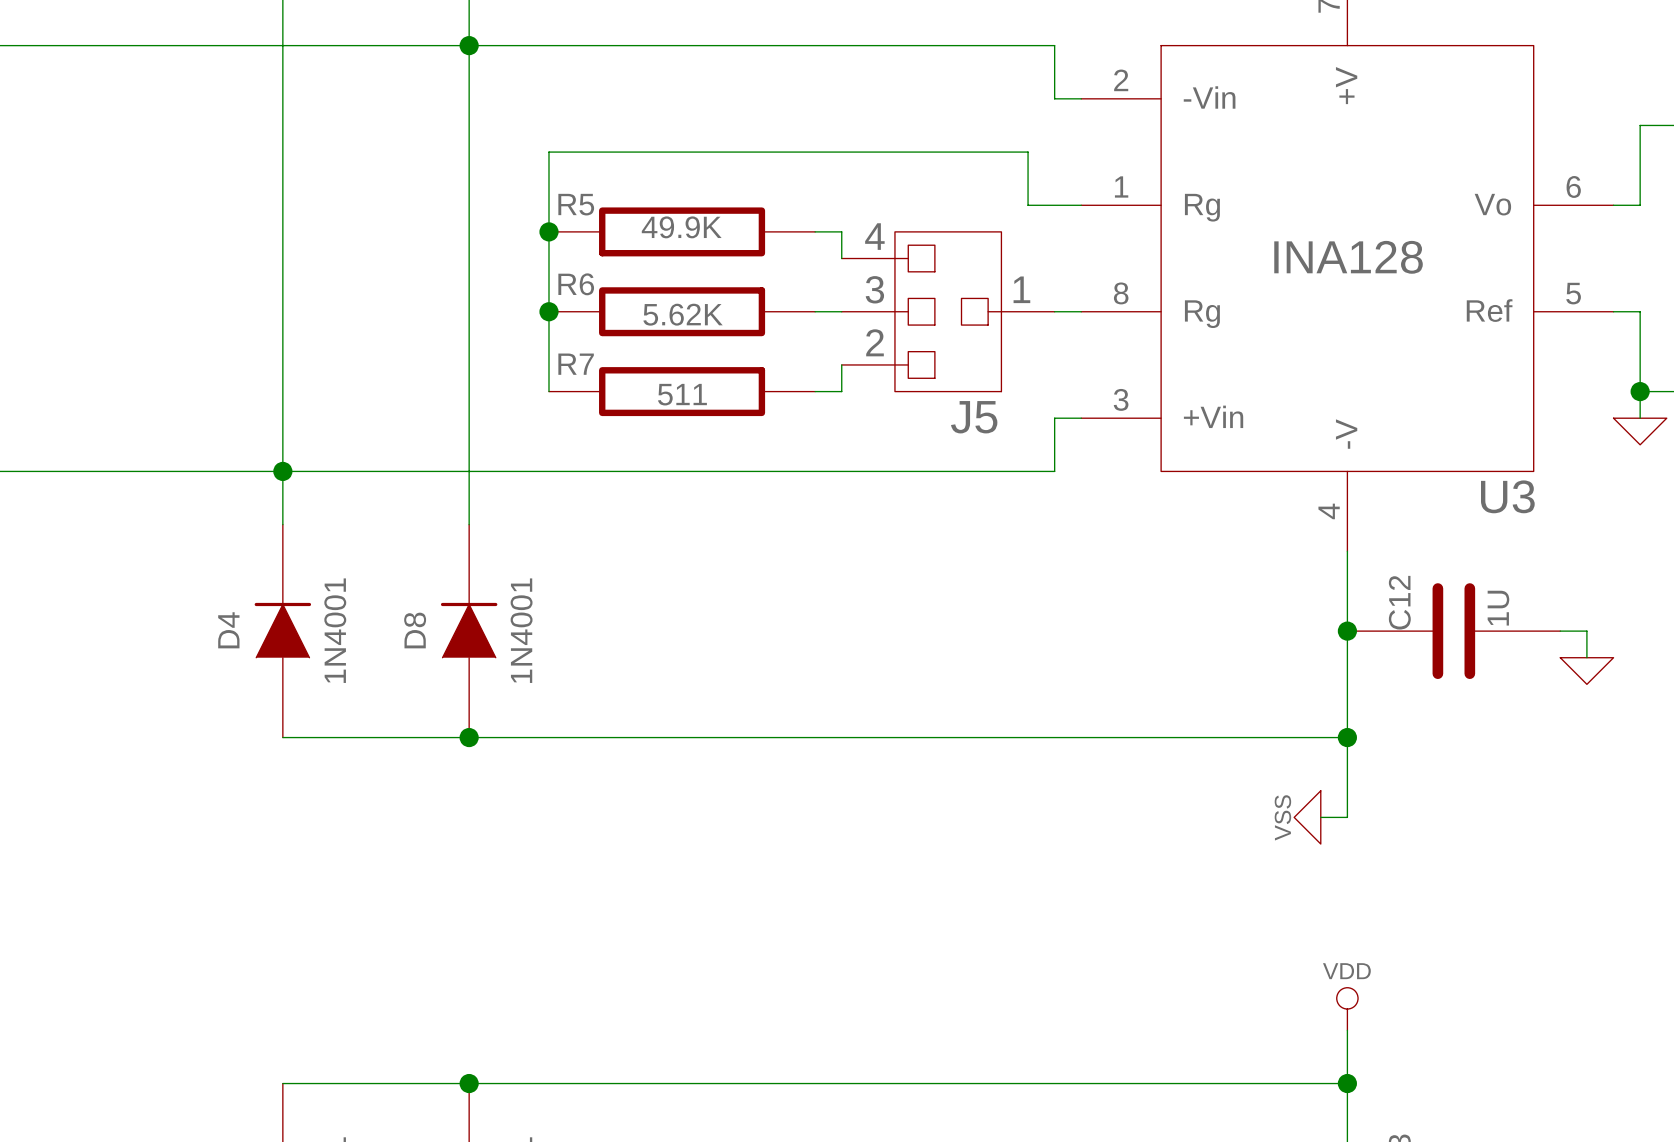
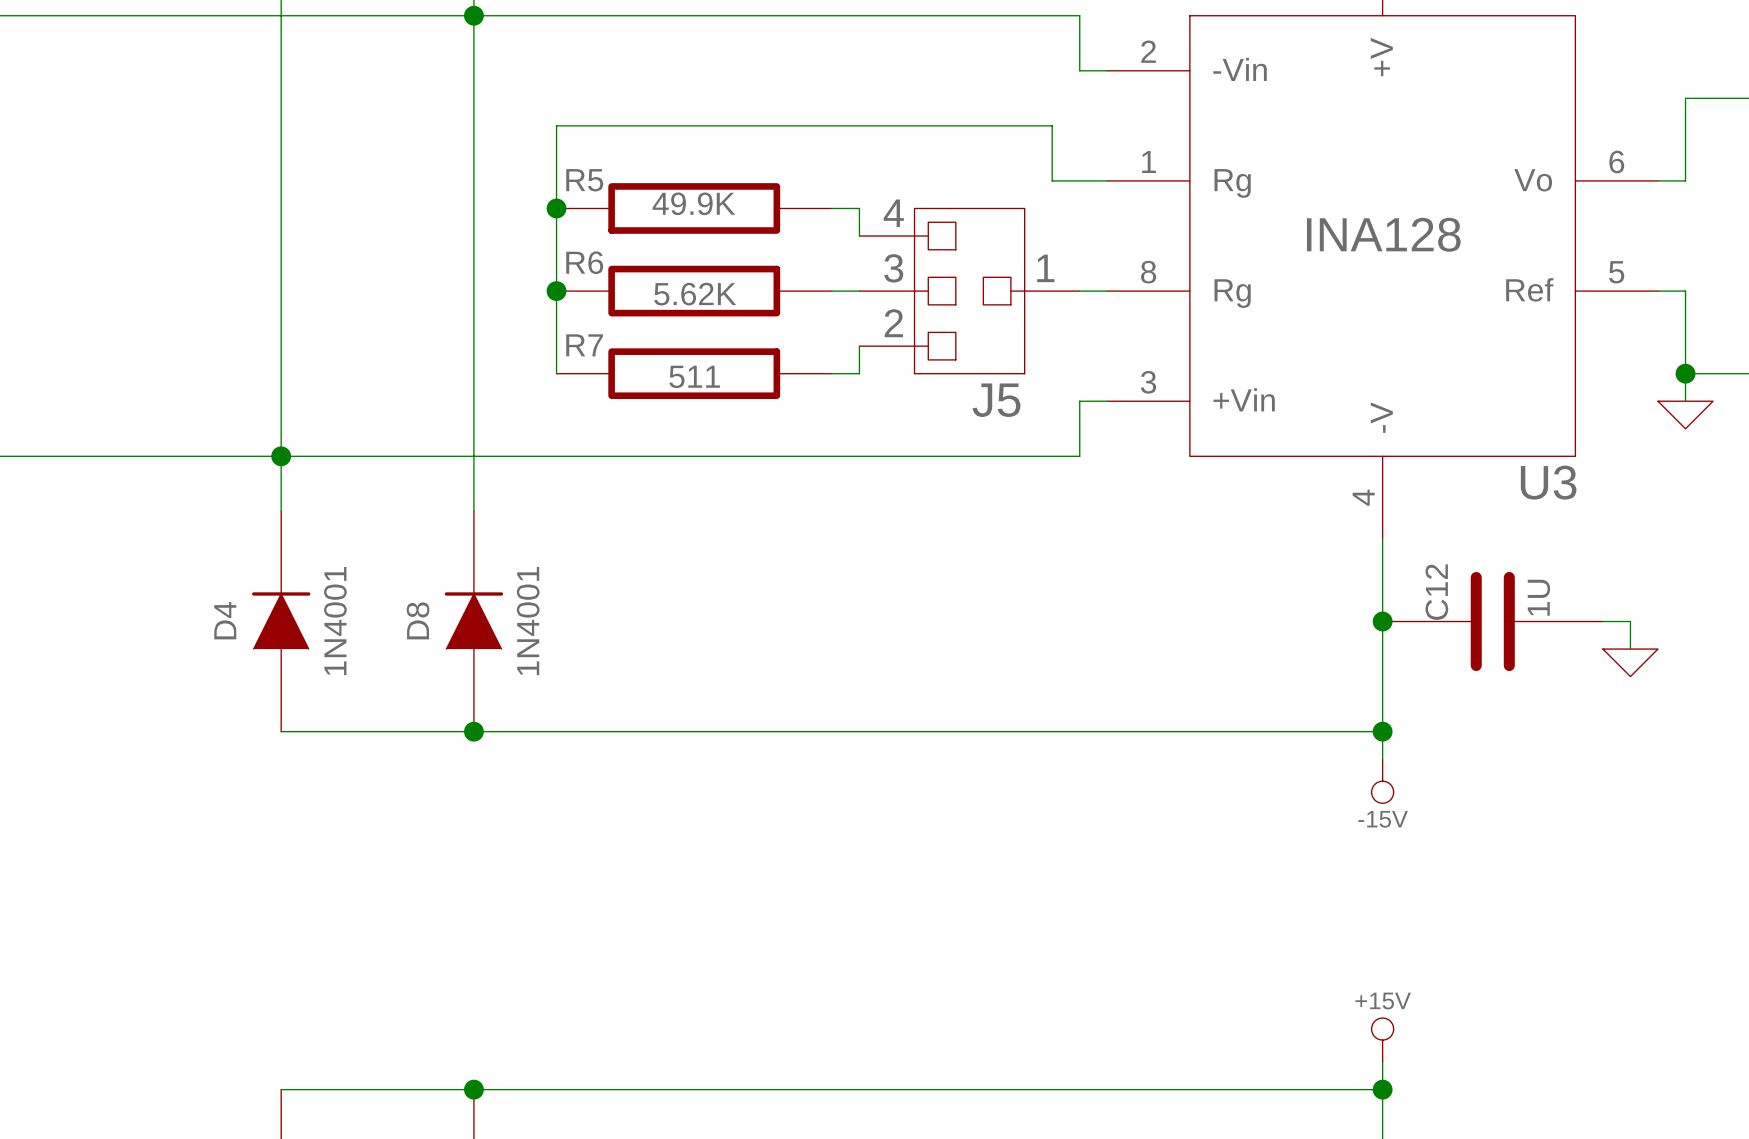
wire: (1347, 764) (1347, 817) (1320, 817) -> none
power symbol: none -> -15V (1382, 781)
power symbol: VSS (1307, 817) -> none
power symbol: VDD (1347, 1009) -> none
power symbol: none -> +15V (1382, 1040)

